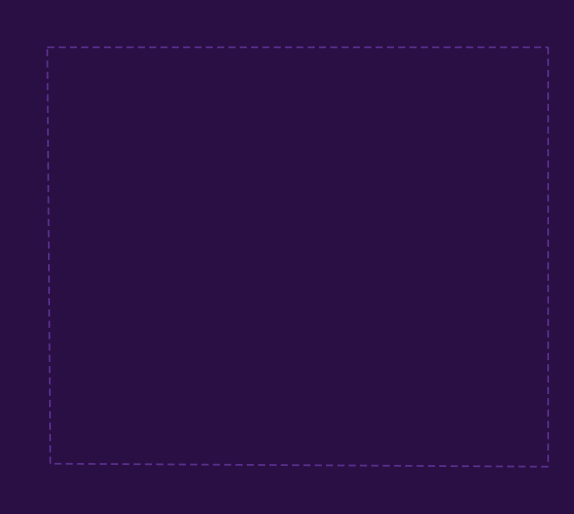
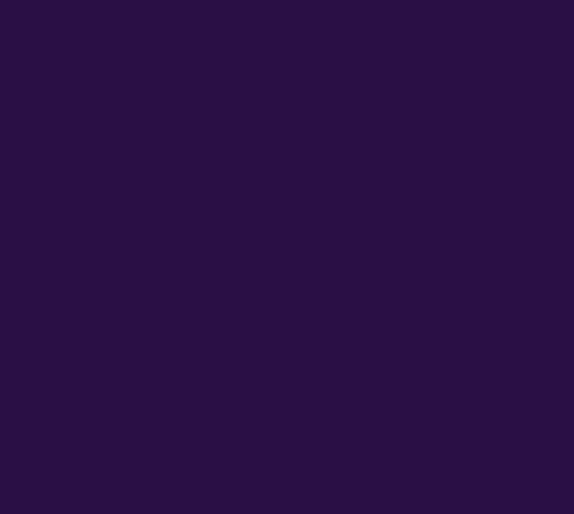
zone outline: (47, 47) (548, 47) (548, 466) (50, 463) (47, 47) -> none

